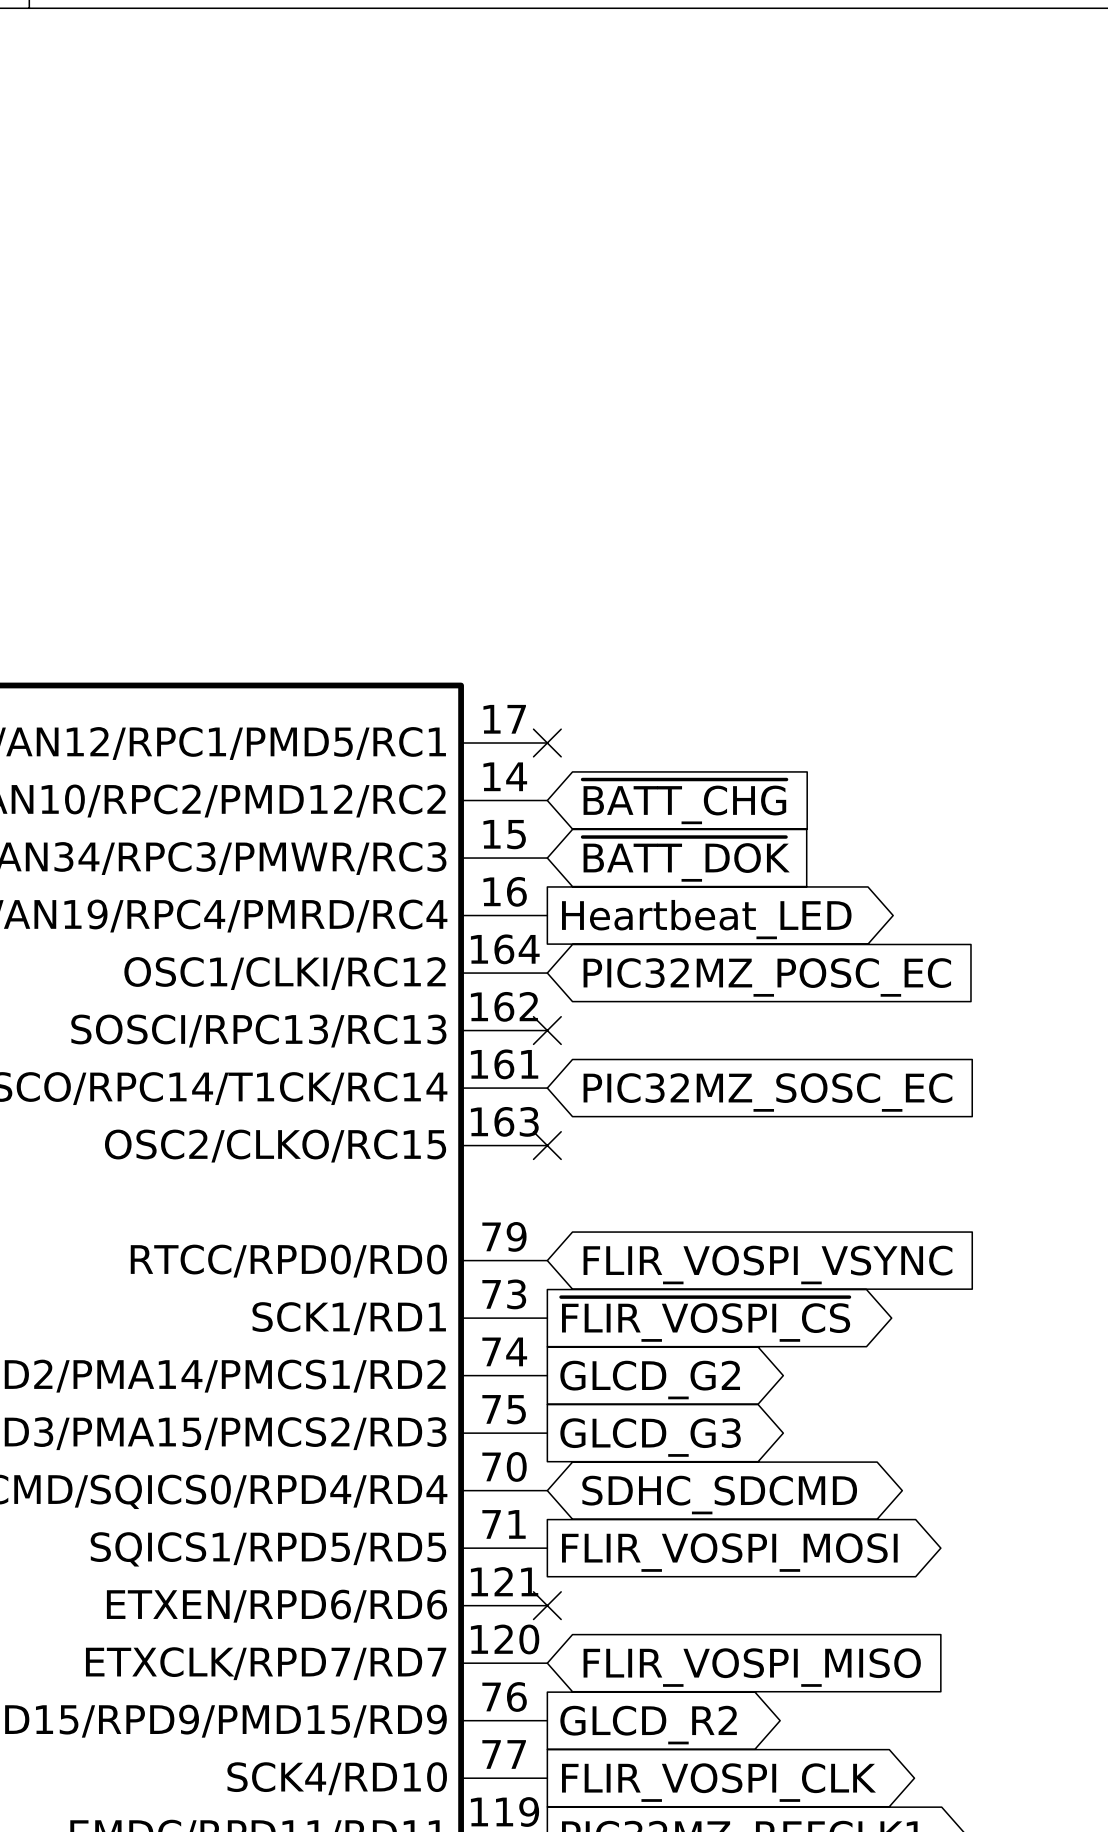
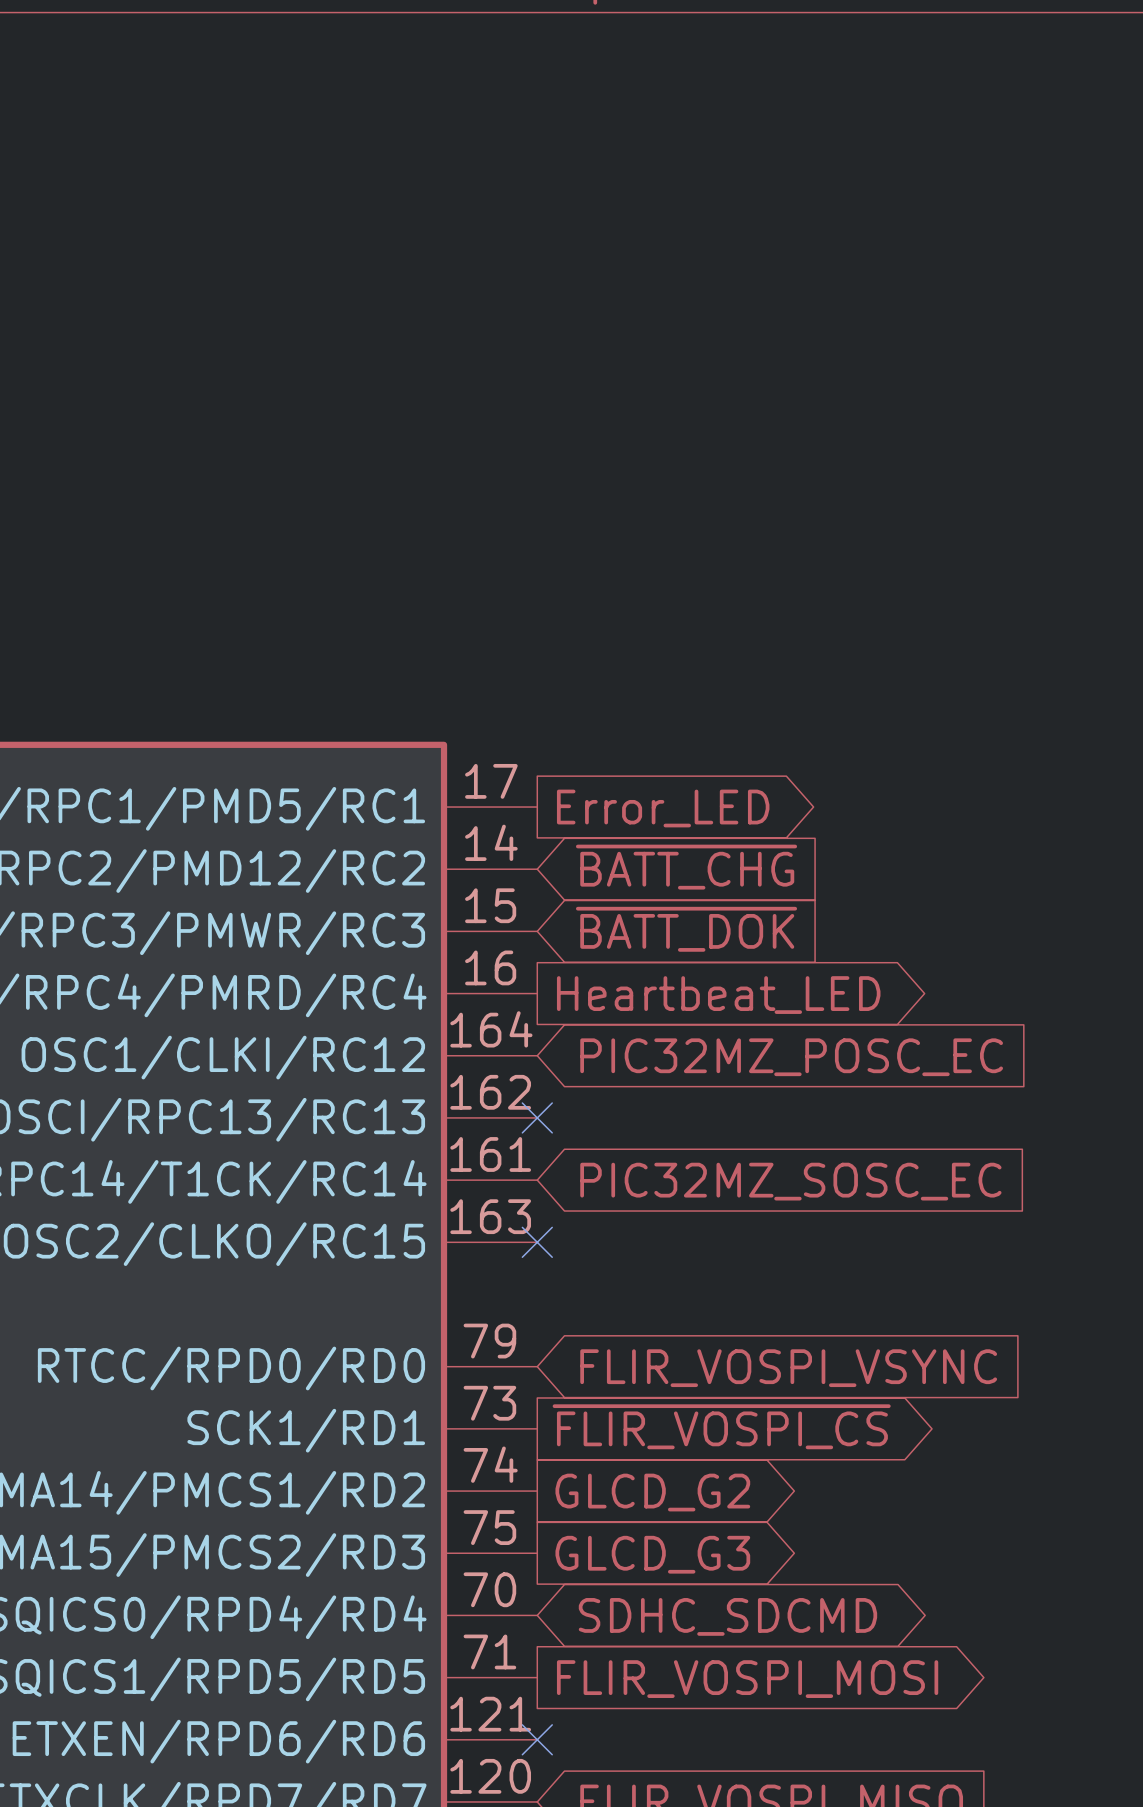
no-connect mark: (547, 743) -> none
global label: none -> Error_LED (663, 808)

